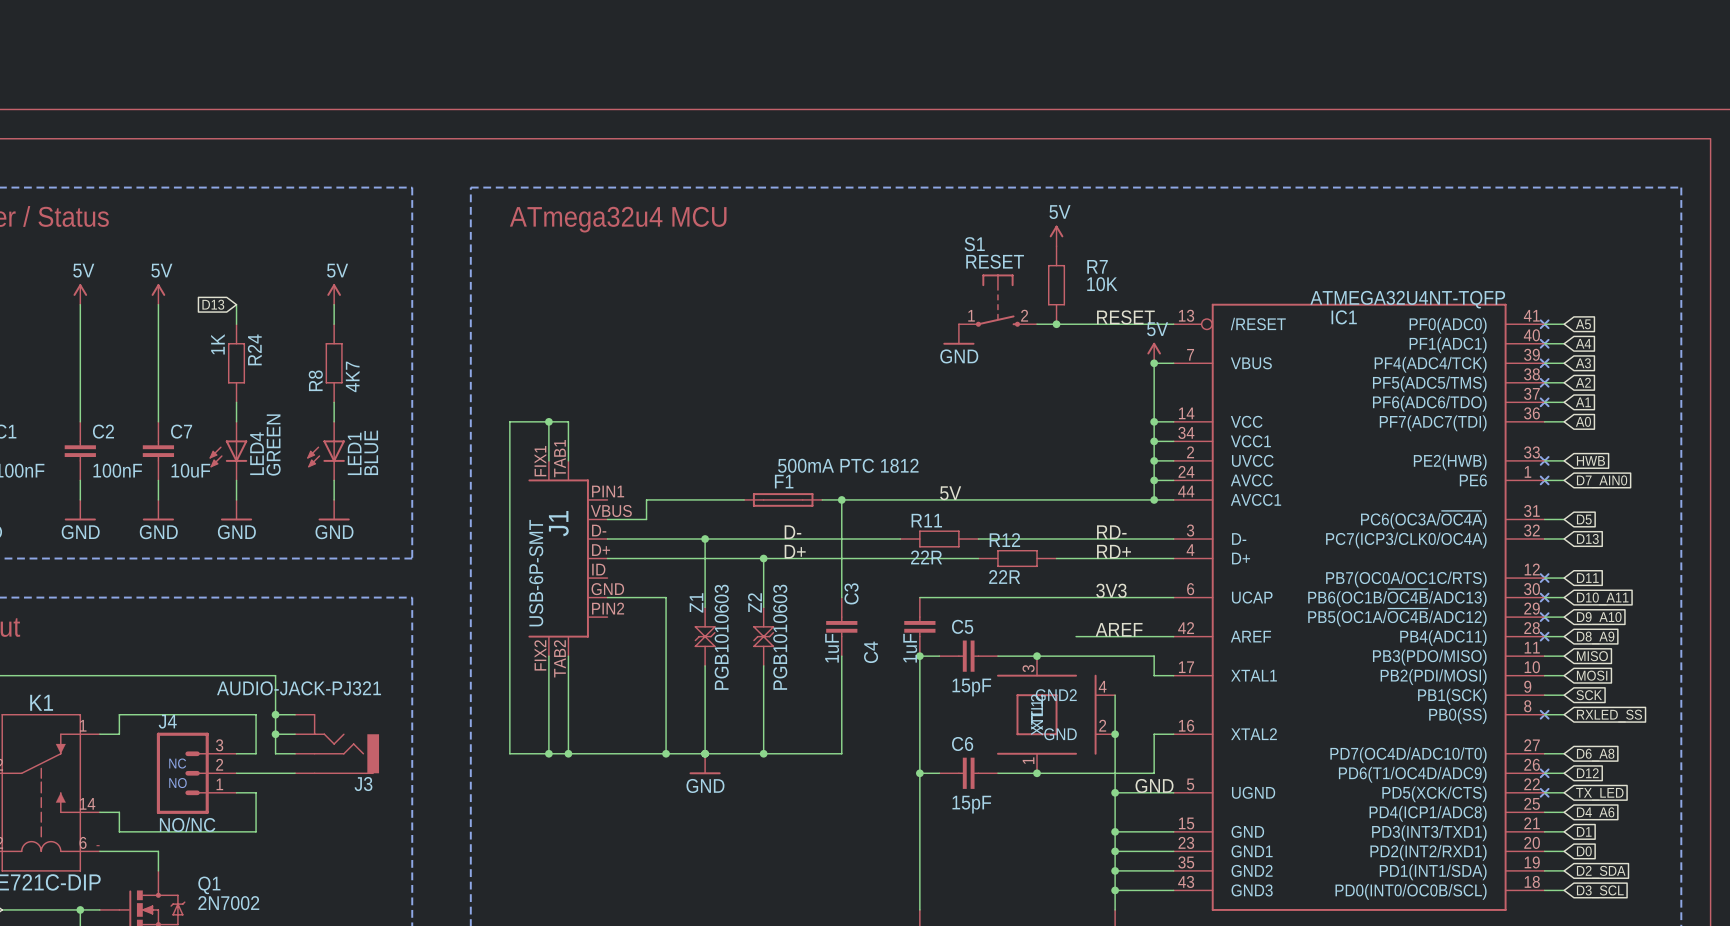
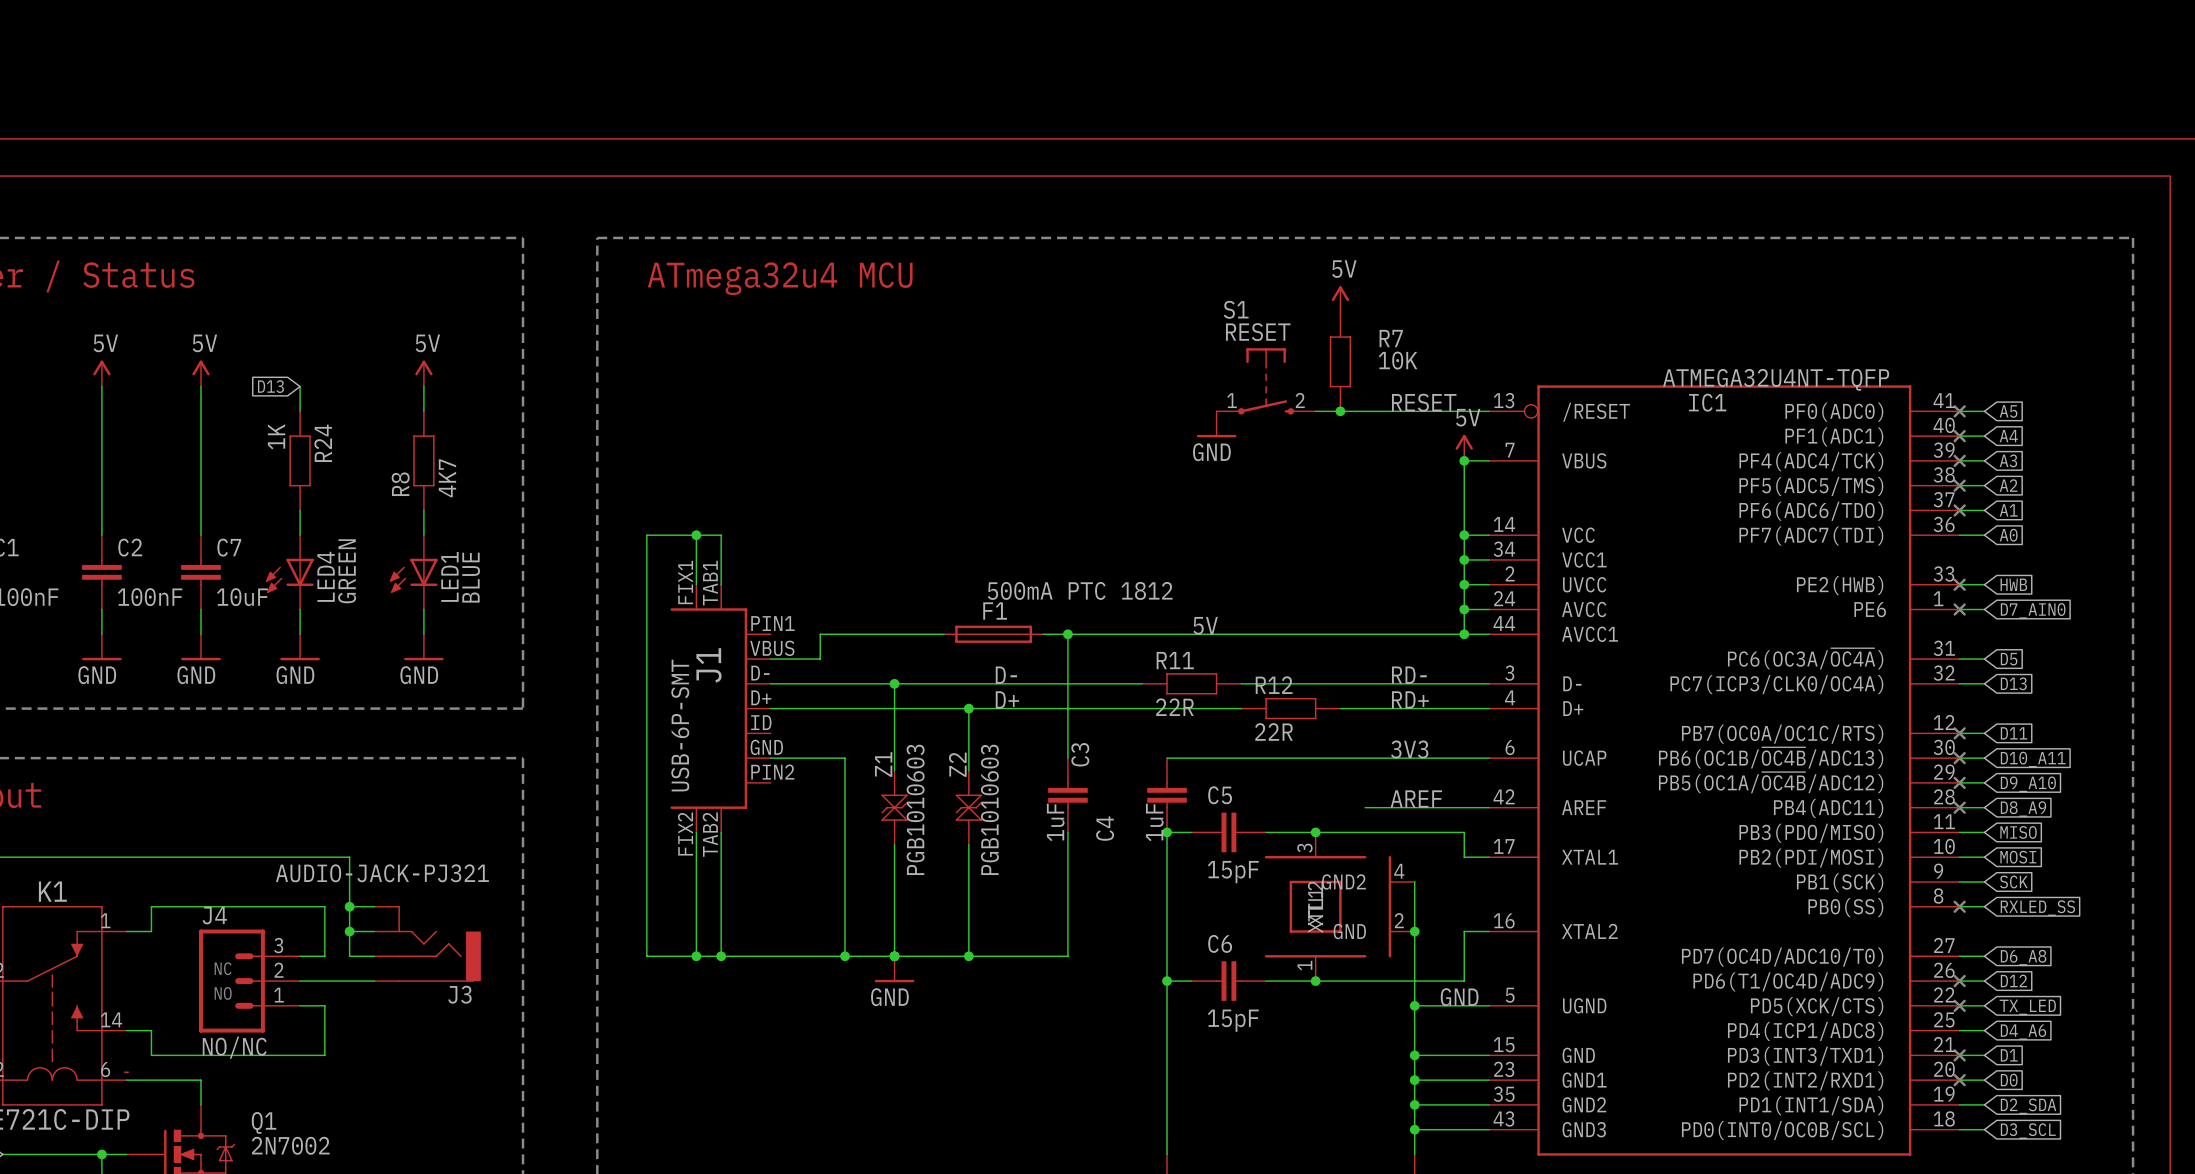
part: none -> (1959, 1055)
part: none -> (1959, 1080)

